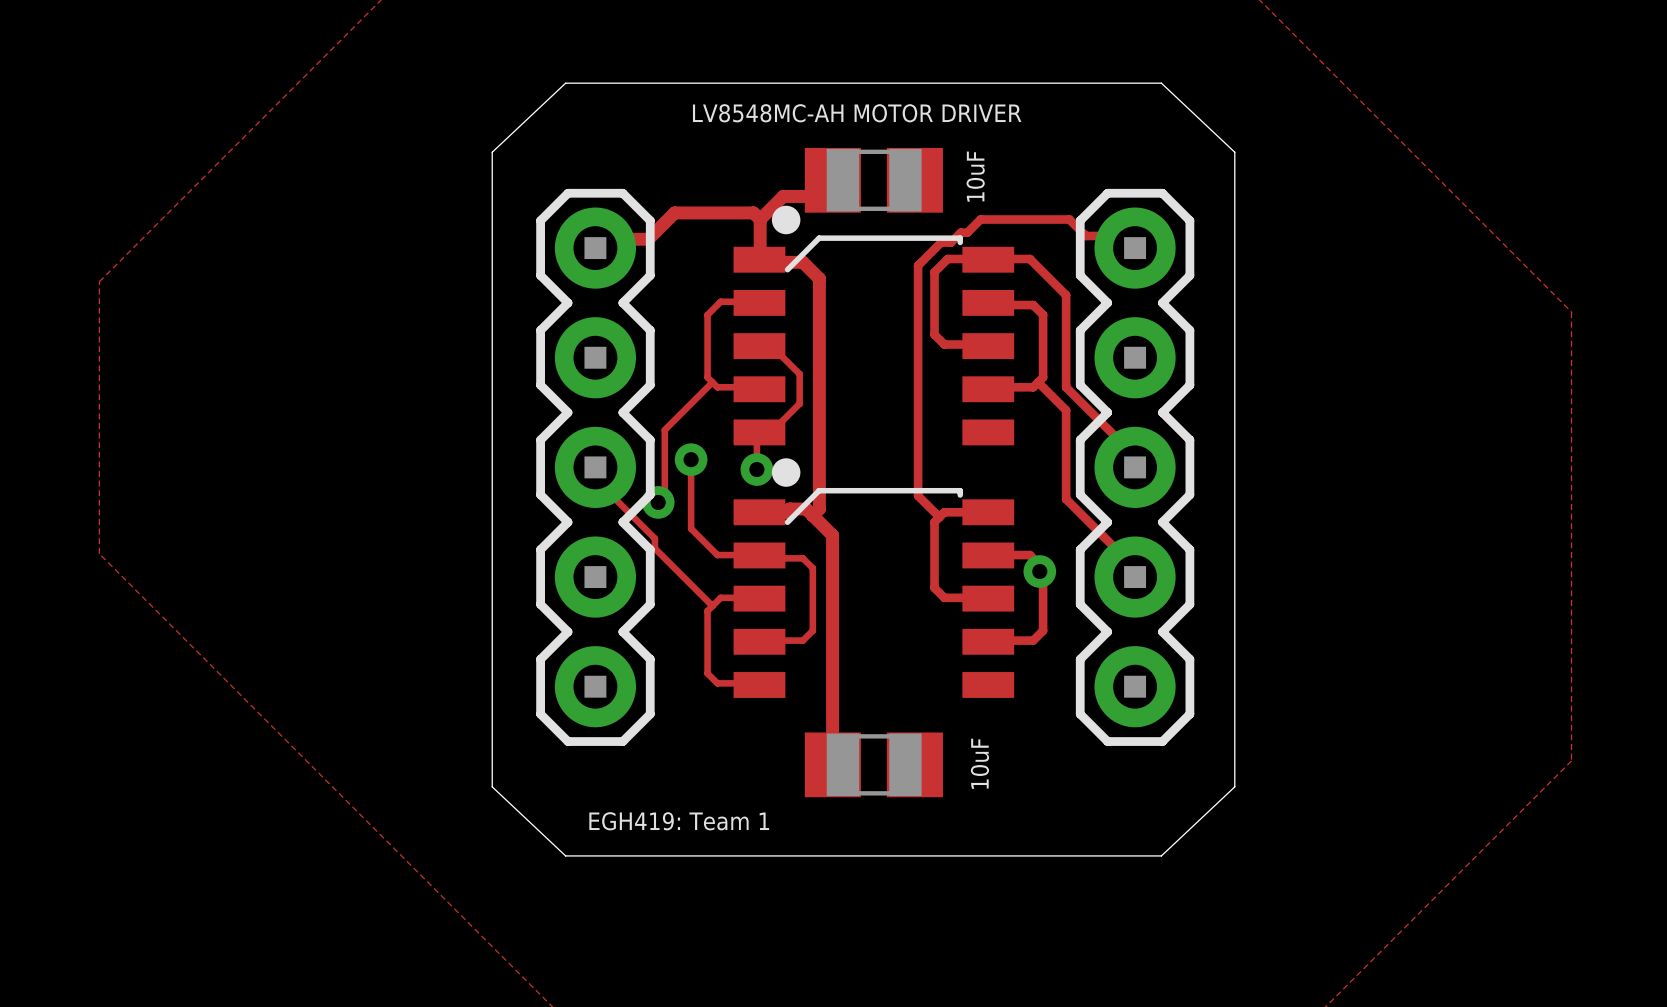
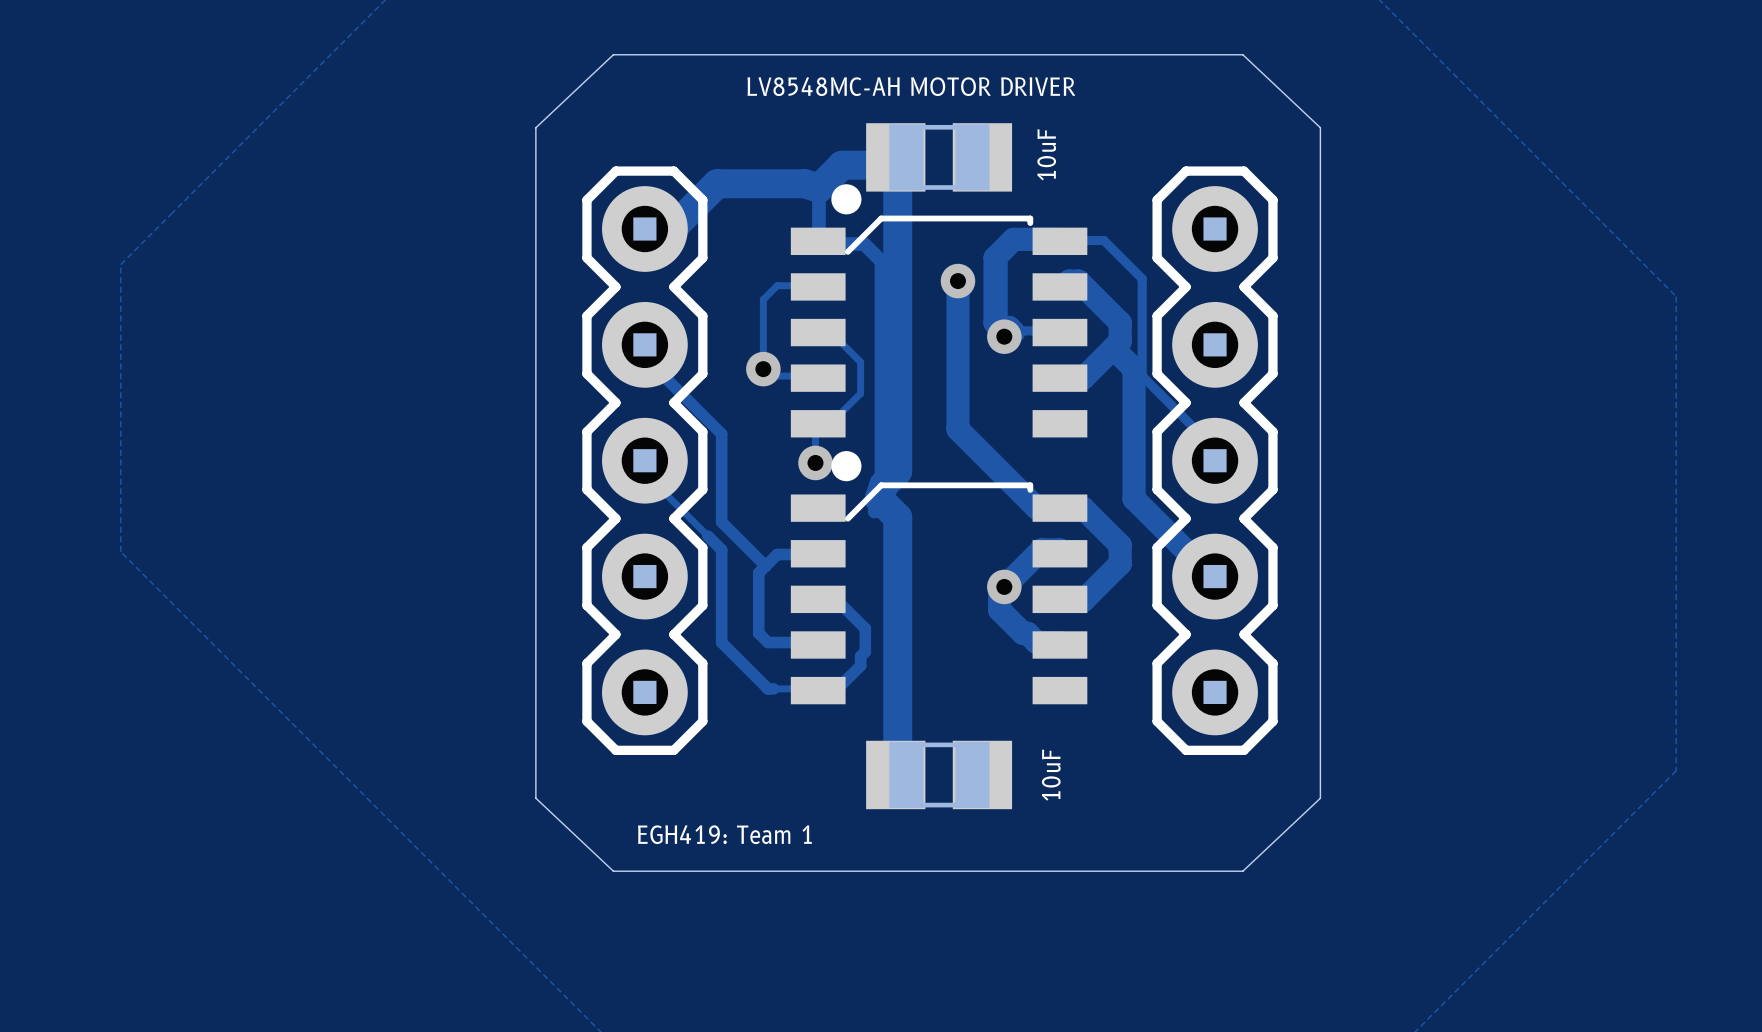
track: (832, 180) (832, 183) (819, 196) (783, 196) (760, 219) (753, 212) (674, 212) (648, 239) (602, 239) (595, 248) -> none
track: (1135, 248) (1122, 235) (1085, 235) (1069, 219) (980, 219) (967, 232) (960, 232) (950, 242) (941, 242) (918, 265) (918, 495) (939, 517) -> none
track: none -> (1059, 241) (1059, 239) (1013, 239) (995, 257) (995, 322) (999, 327) (1008, 327) (1013, 332) (1004, 336)
track: none -> (957, 281) (957, 429) (1036, 508)
via: none -> (957, 281)
track: (988, 302) (990, 305) (1033, 305) (1043, 314) (1043, 377) (1033, 387) (990, 387) (988, 389) -> (1059, 286) (1069, 281) (1078, 281) (1120, 322) (1120, 341) (1083, 378) (1059, 378)
via: none -> (1004, 336)
track: none -> (644, 344) (647, 345) (647, 359) (721, 434) (721, 522) (765, 566)
via: none -> (763, 369)
track: (712, 382) (664, 430) (664, 495) (658, 502) -> none
track: (1038, 382) (1066, 410) (1066, 499) (1131, 564) (1131, 574) (1135, 577) -> (1113, 348) (1134, 369) (1134, 498) (1212, 577) (1215, 576)
track: (691, 459) (691, 528) (717, 555) (756, 555) (759, 555) (760, 558) (802, 558) (812, 568) (812, 630) (802, 640) (759, 641) -> (818, 553) (777, 554) (758, 573) (758, 633) (767, 642) (814, 642) (818, 644)
via: (691, 459) -> none
via: (658, 502) -> none
track: (759, 512) (786, 512) (789, 509) (806, 509) (832, 535) (832, 764) -> (644, 229) (647, 225) (675, 225) (717, 183) (805, 183) (818, 188) (842, 165) (888, 165) (895, 157) (902, 169) (902, 174) (897, 179) (897, 471) (883, 484) (879, 498) (897, 517) (897, 772) (895, 774)
track: (966, 512) (944, 512) (934, 522) (934, 587) (944, 597) (988, 598) -> (1059, 508) (1083, 508) (1120, 545) (1120, 563) (1083, 600) (1059, 599)
track: (654, 538) (654, 548) (712, 606) -> (707, 535) (721, 549) (721, 642) (767, 688) (773, 688)
track: (988, 555) (1029, 555) (1043, 568) (1043, 630) (1033, 640) (988, 641) -> (1059, 553) (1059, 549) (1041, 549) (999, 591) (999, 610) (1022, 633) (1027, 633) (1036, 642) (1059, 642) (1059, 644)
via position: (1039, 571) -> (1004, 586)
track: (759, 598) (720, 597) (707, 610) (707, 673) (717, 683) -> (818, 599) (837, 600) (865, 628) (865, 651) (860, 656) (860, 665) (837, 688) (818, 688) (818, 690) (814, 688)

